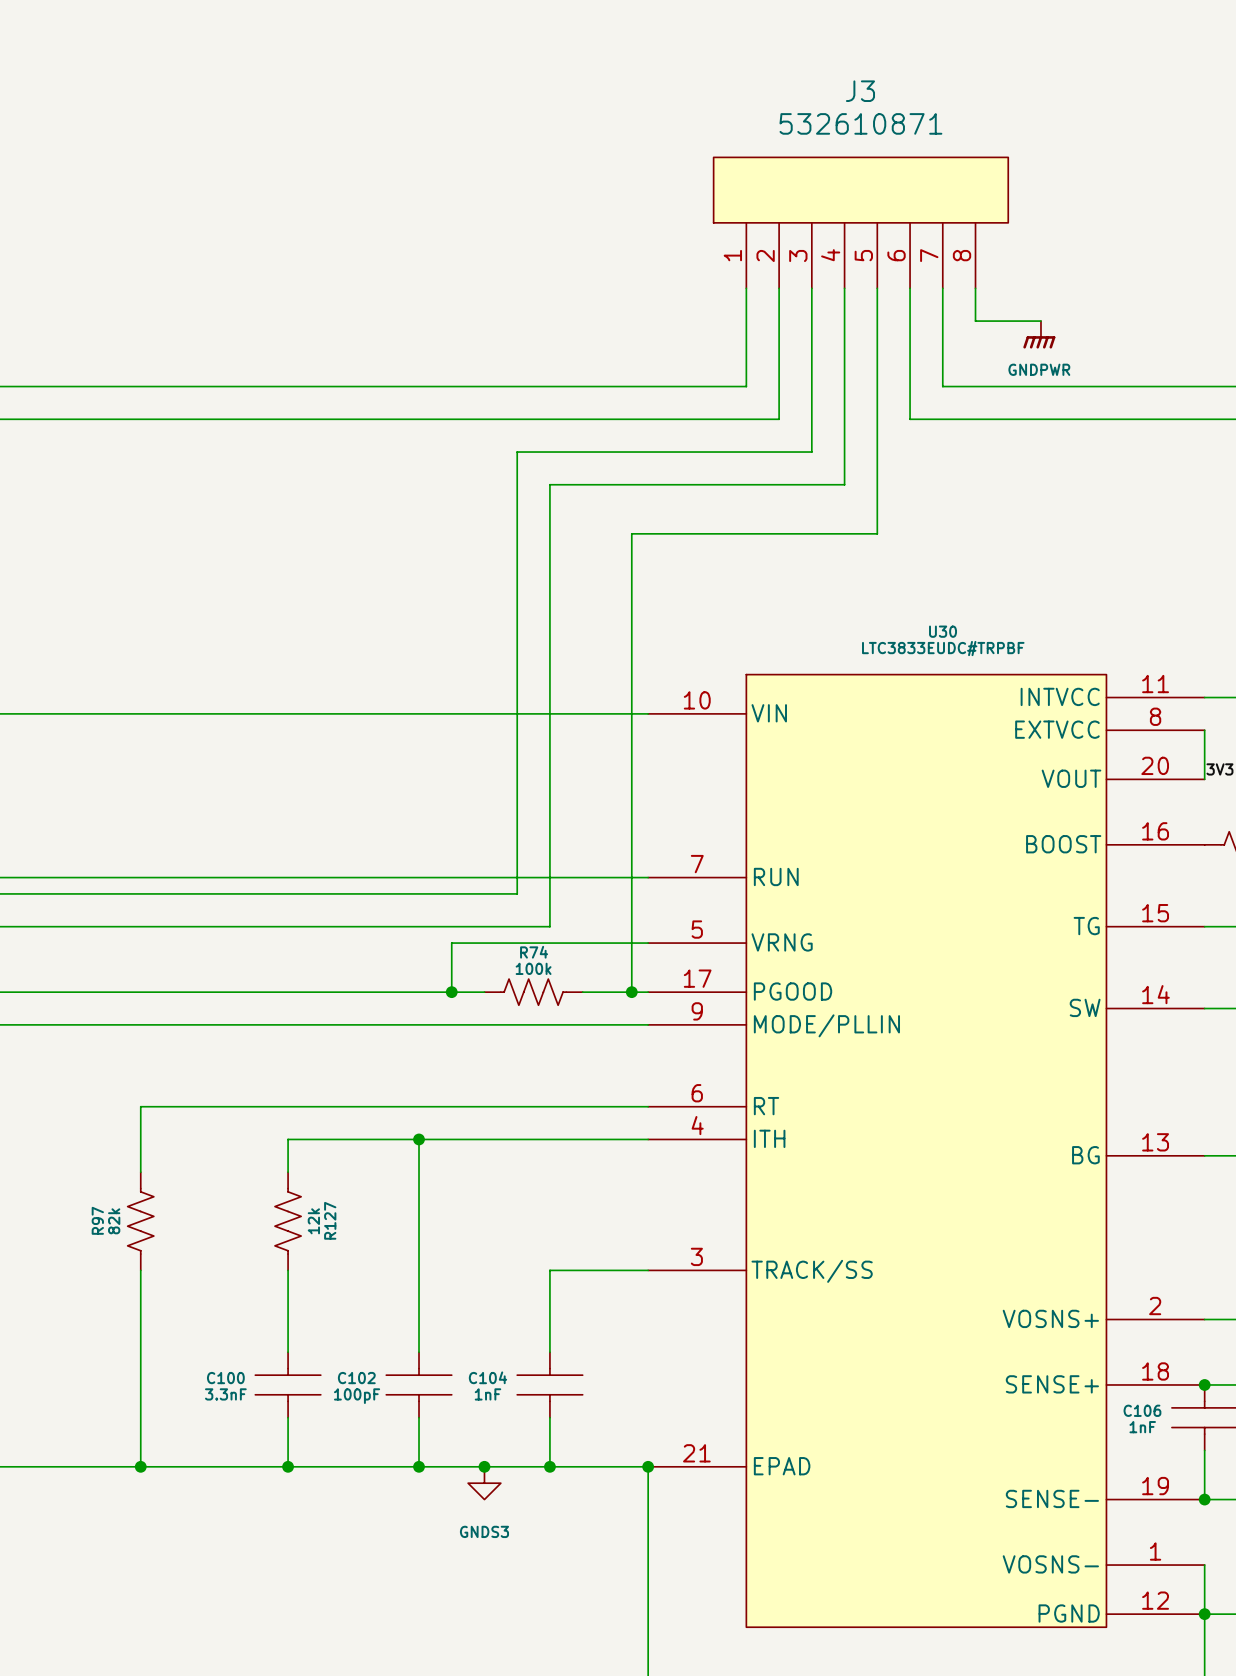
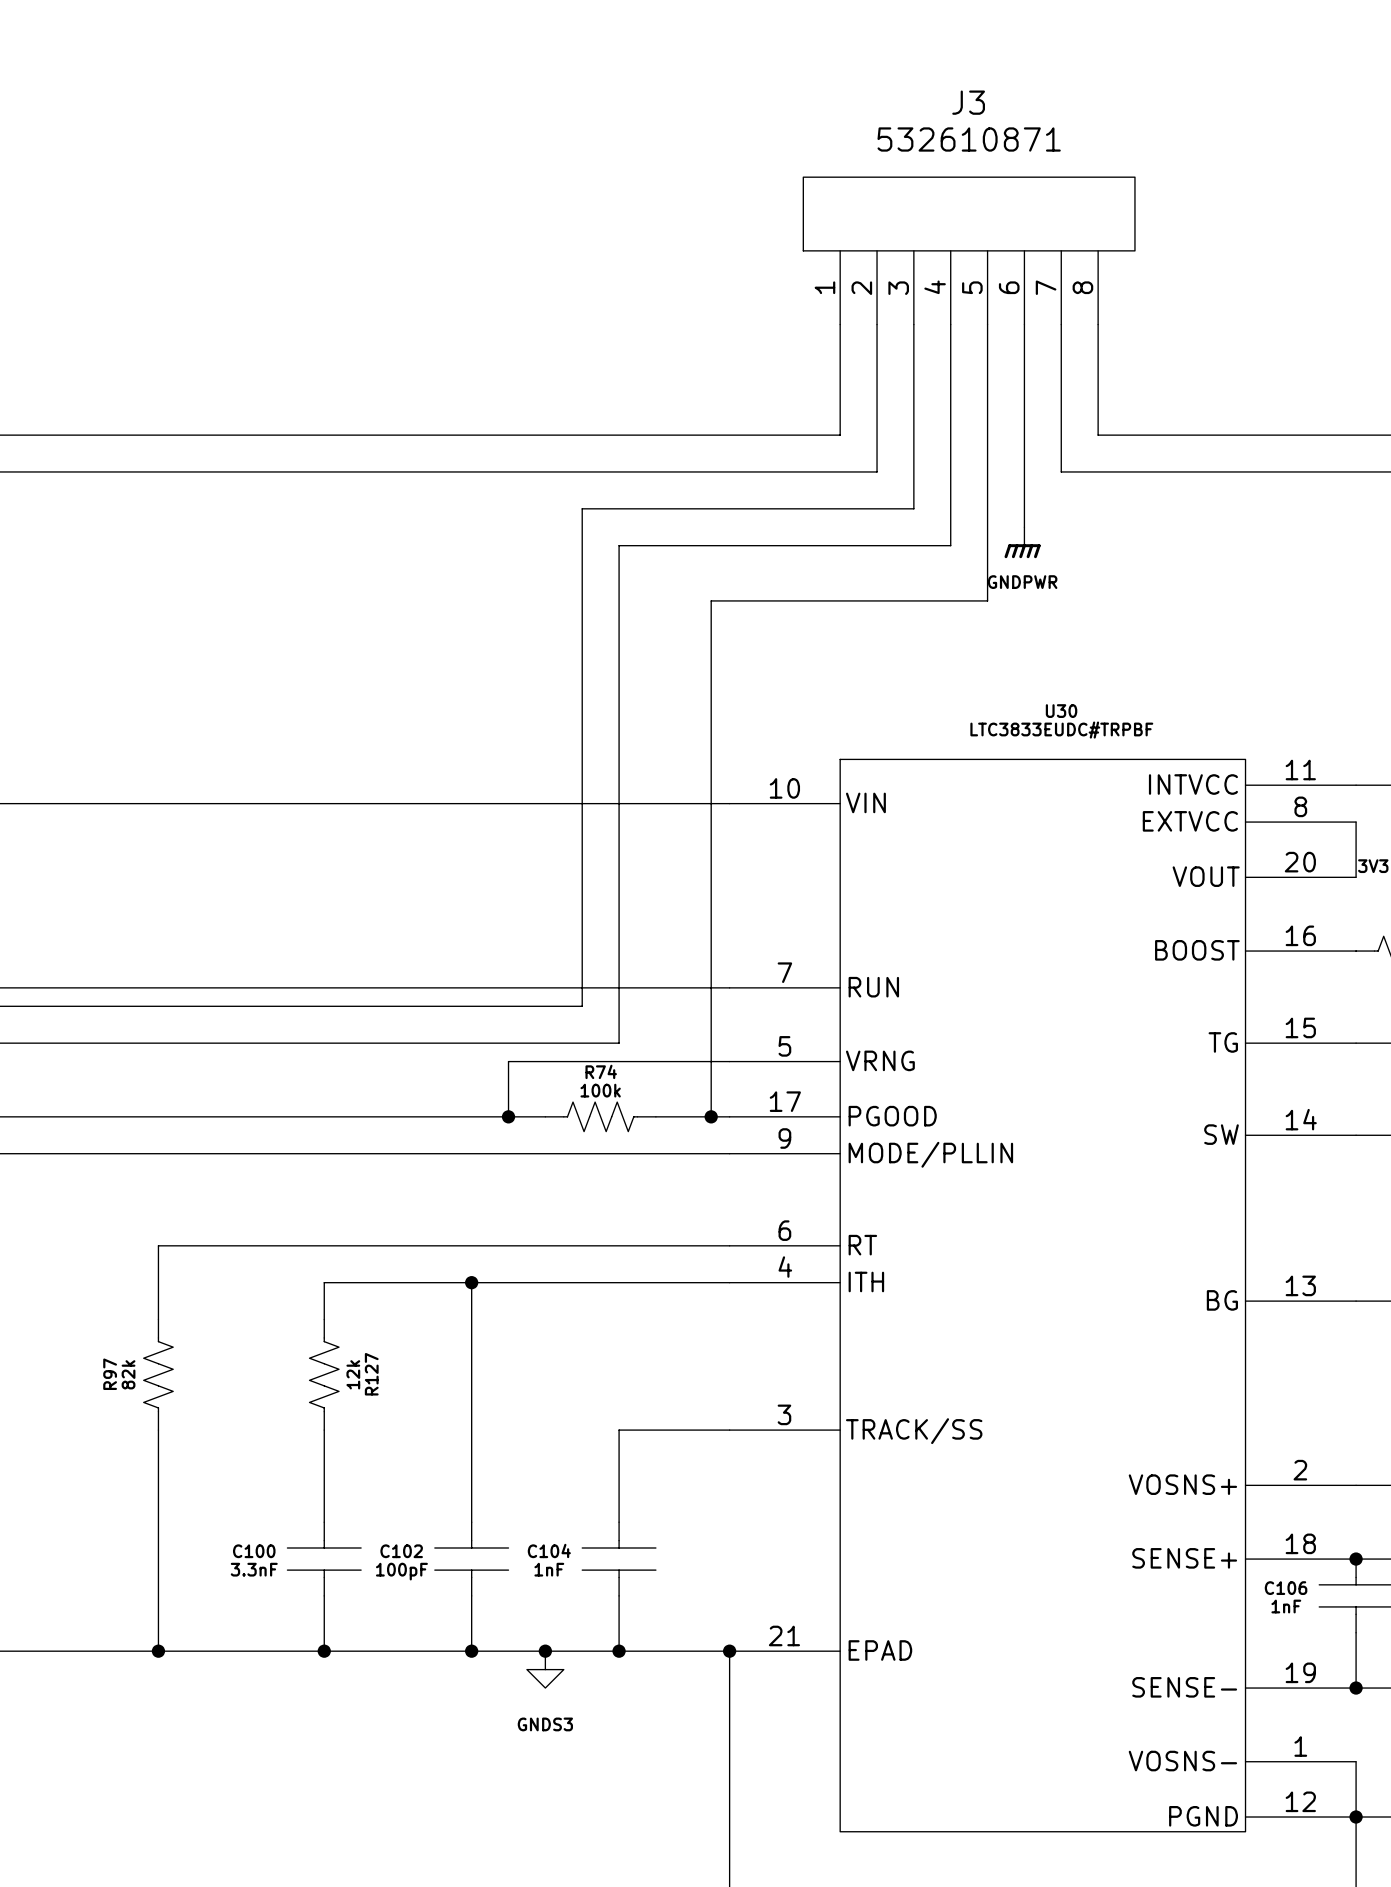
wire: (975, 321) (1040, 321) -> none
power symbol position: GNDPWR (1039, 334) -> GNDPWR (1022, 542)
wire: (942, 386) (975, 386) -> (1098, 361) (1098, 435)
wire: (910, 419) (942, 419) -> (1061, 435) (1061, 471)
wire: none -> (1024, 471) (1024, 527)

